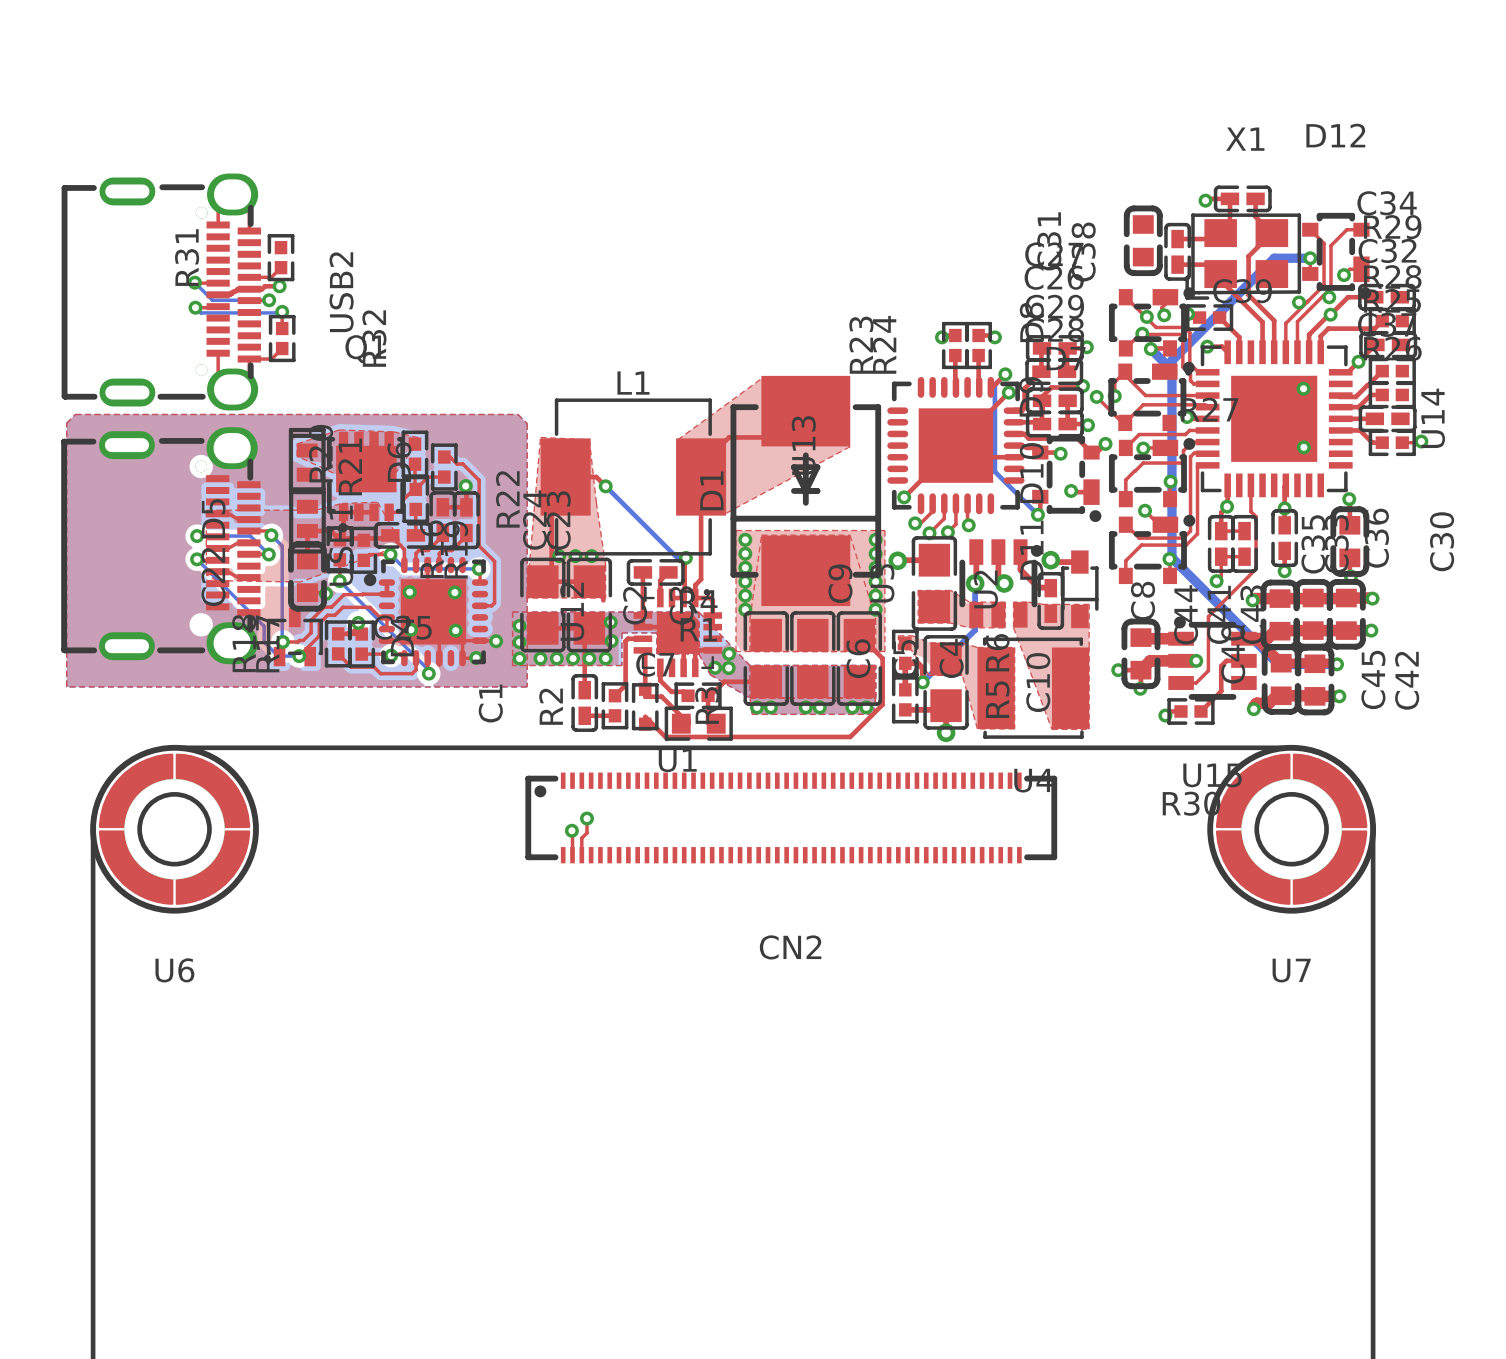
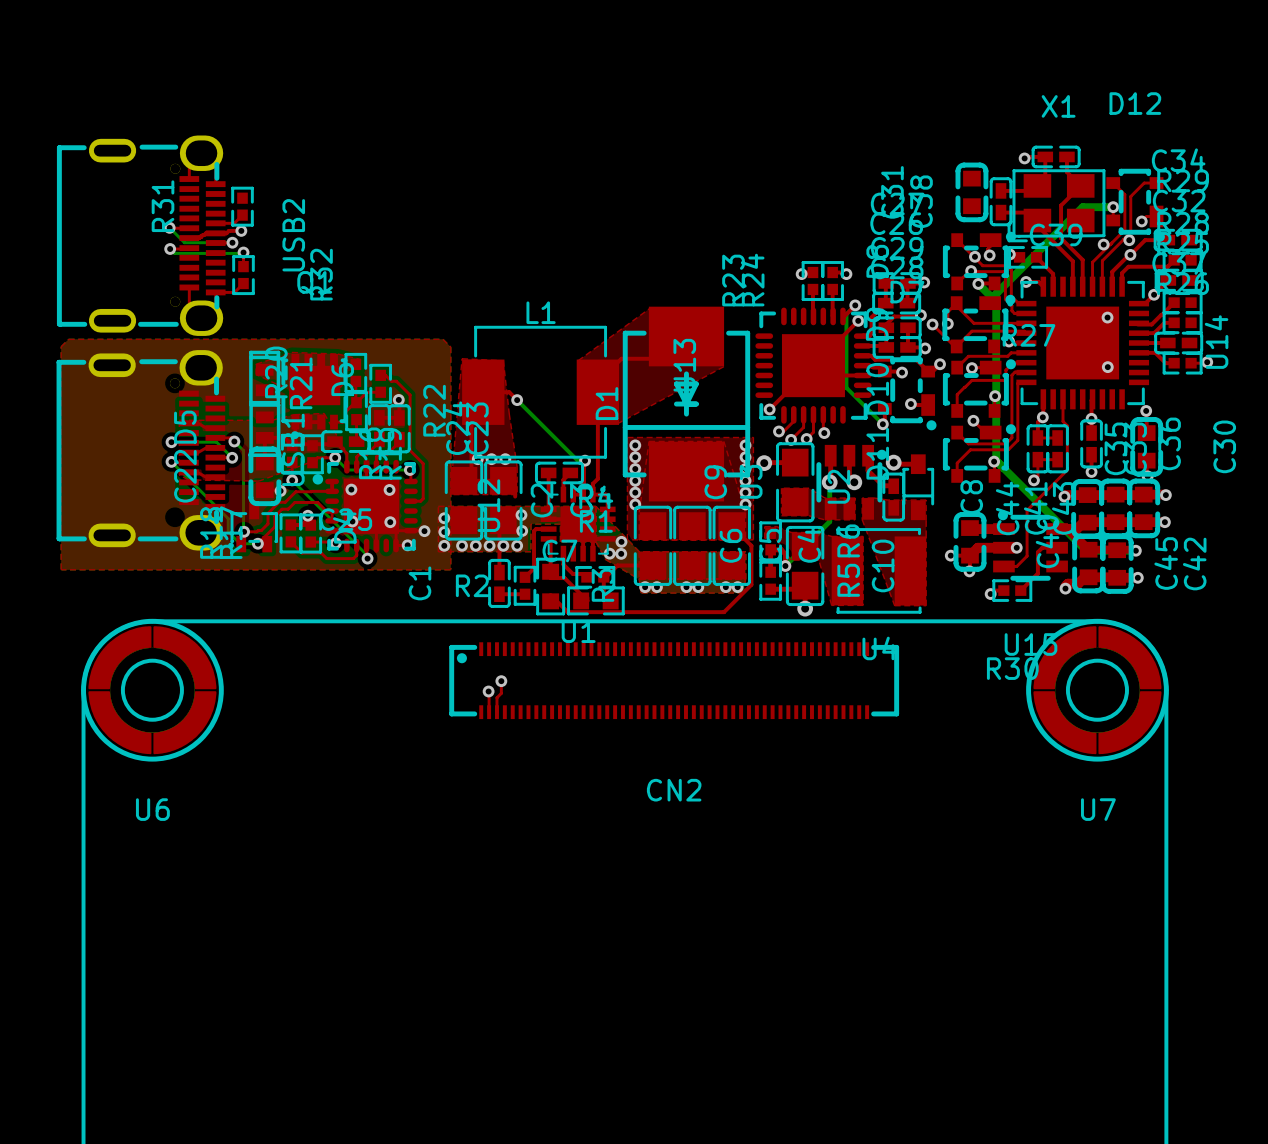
R2 footprint: [631, 682, 659, 731] -> [536, 557, 566, 616]
R2 name rotation: 0° (551, 706) -> 90° clockwise (472, 585)

